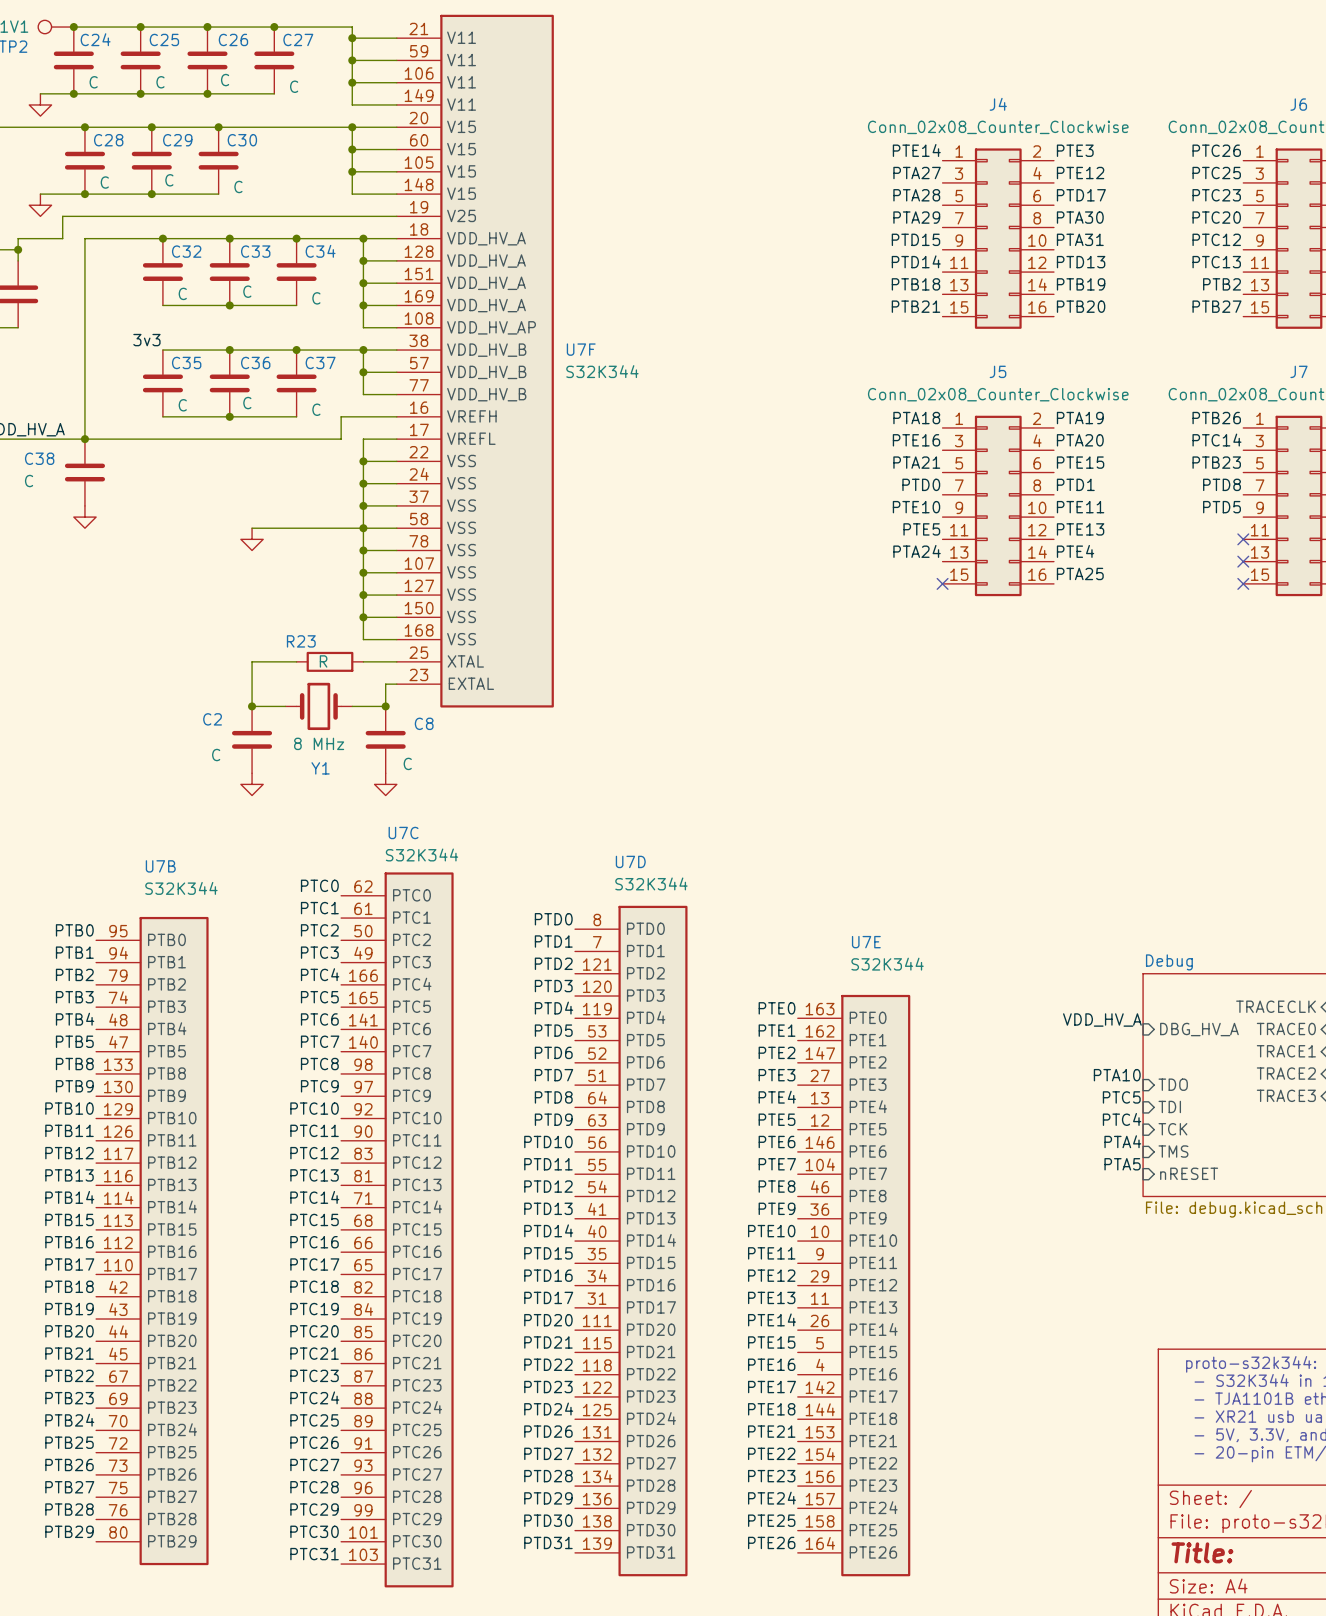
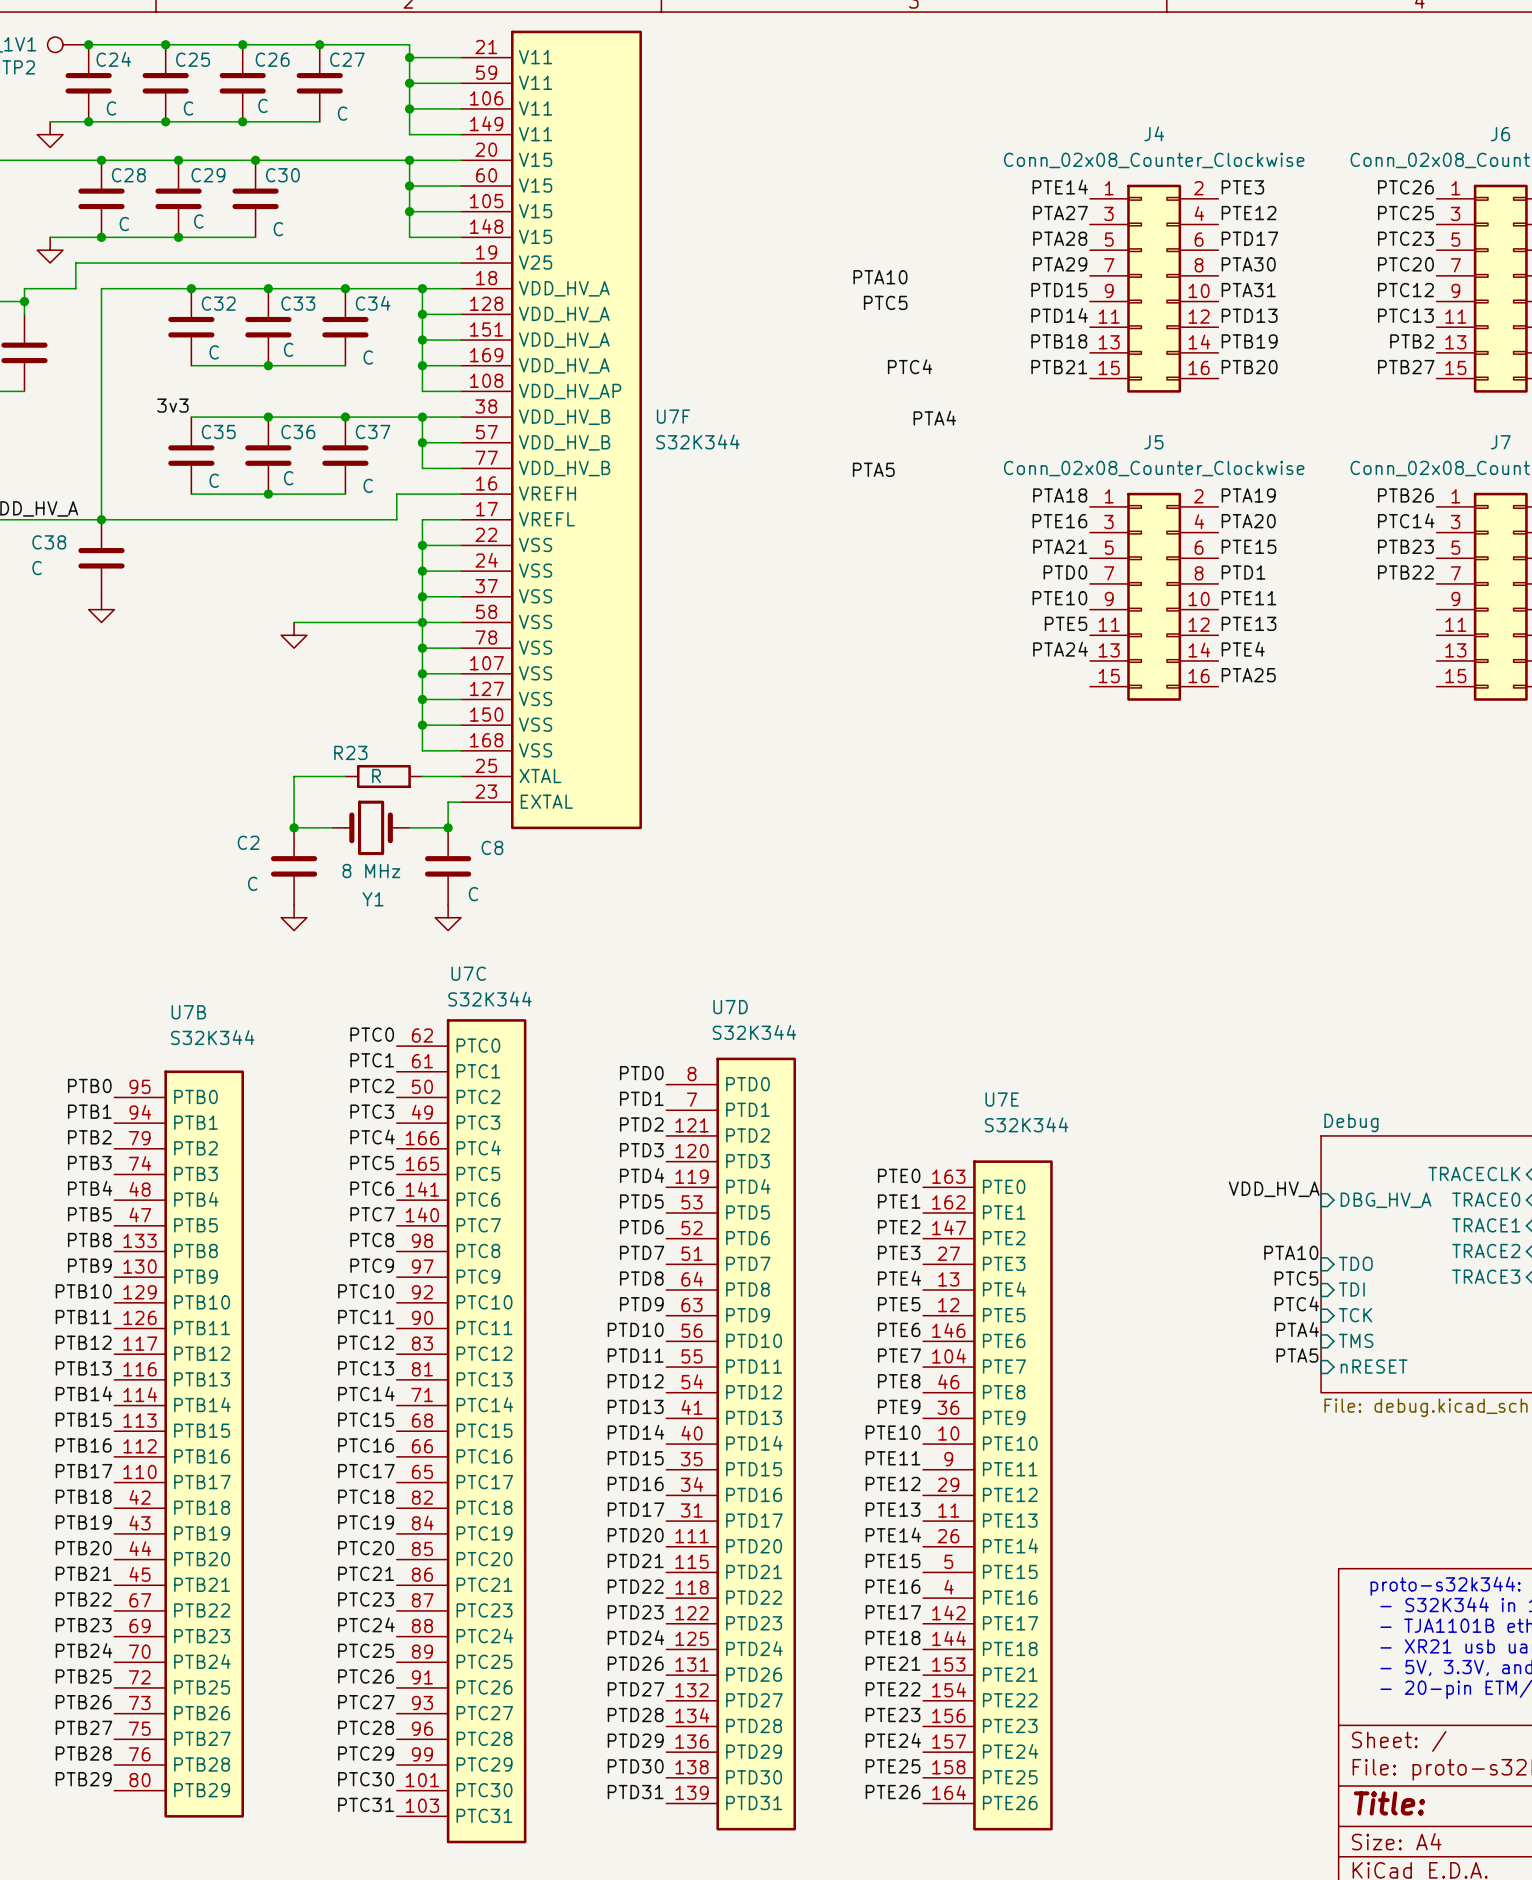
label: none -> PTA10 (880, 277)
label: none -> PTC5 (885, 302)
label: none -> PTC4 (910, 366)
label: none -> PTA4 (934, 418)
label: none -> PTA5 (873, 469)
label: PTD8 (1222, 484) -> PTB22 (1405, 572)
label: PTD5 (1222, 507) -> none
no-connect mark: (1243, 539) -> none
no-connect mark: (1243, 561) -> none
no-connect mark: (942, 583) -> none
no-connect mark: (1243, 583) -> none

